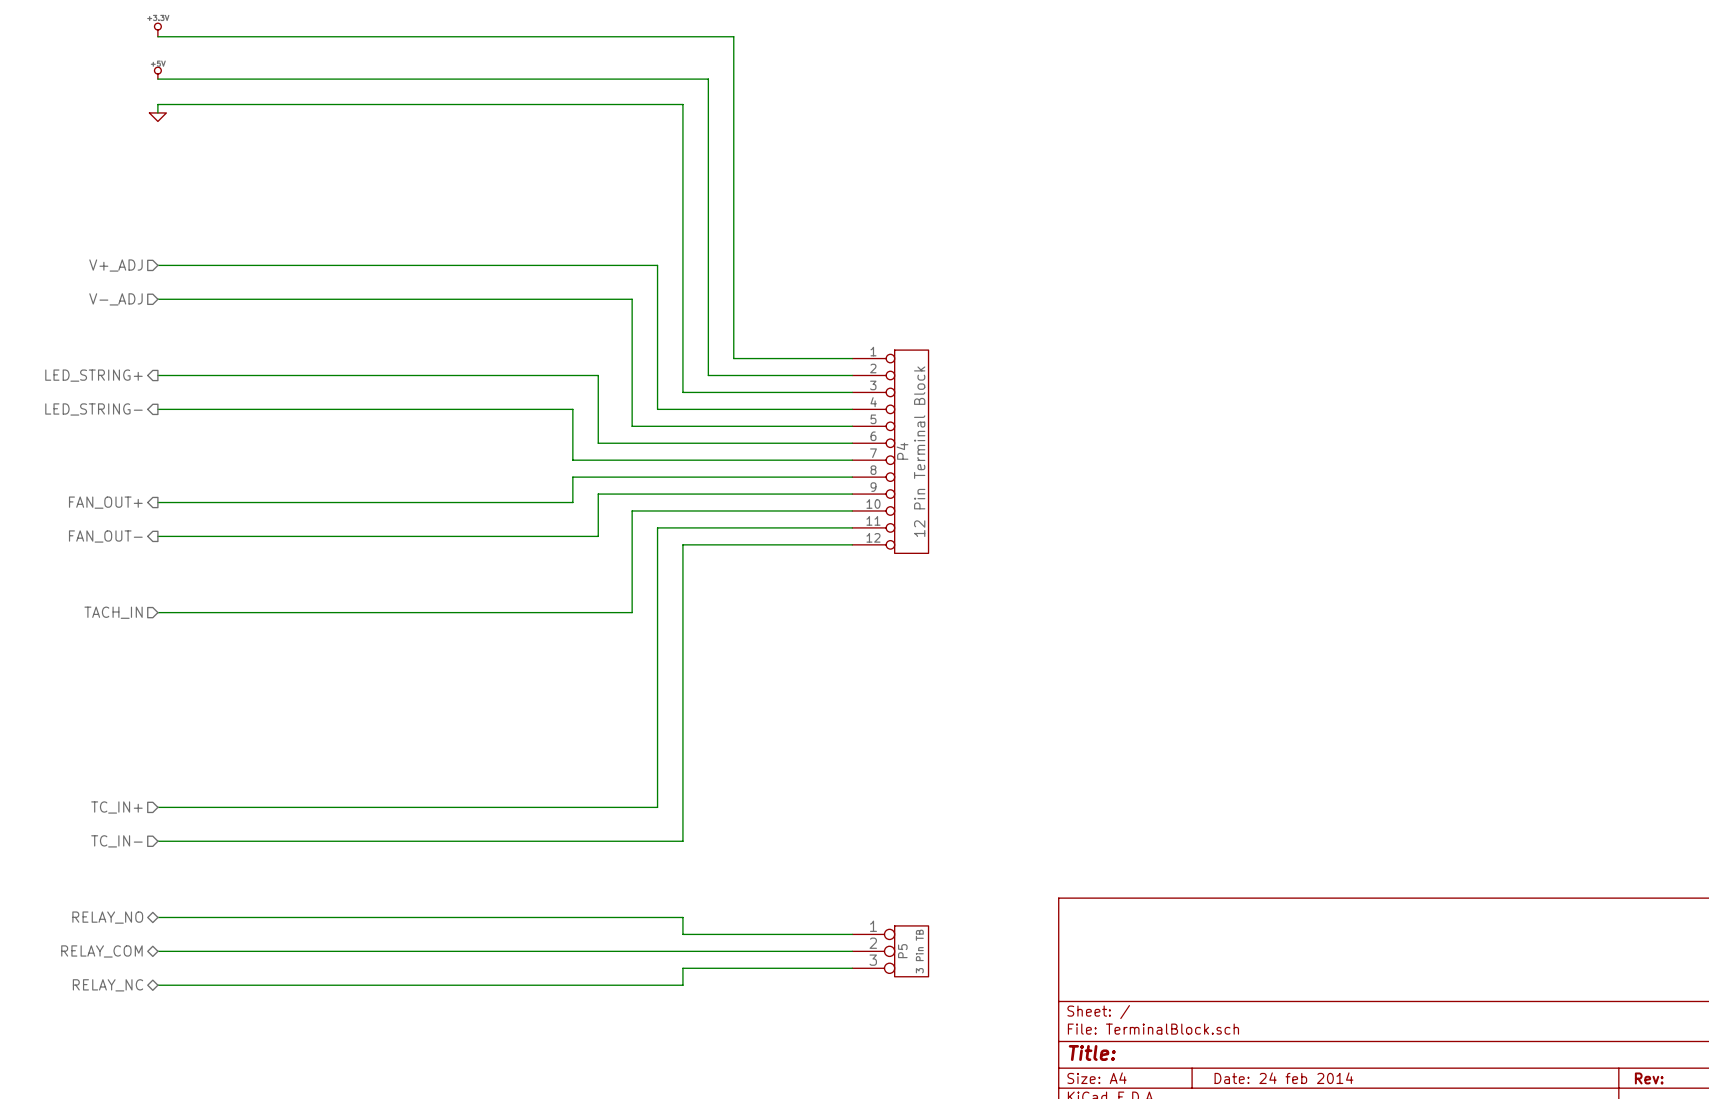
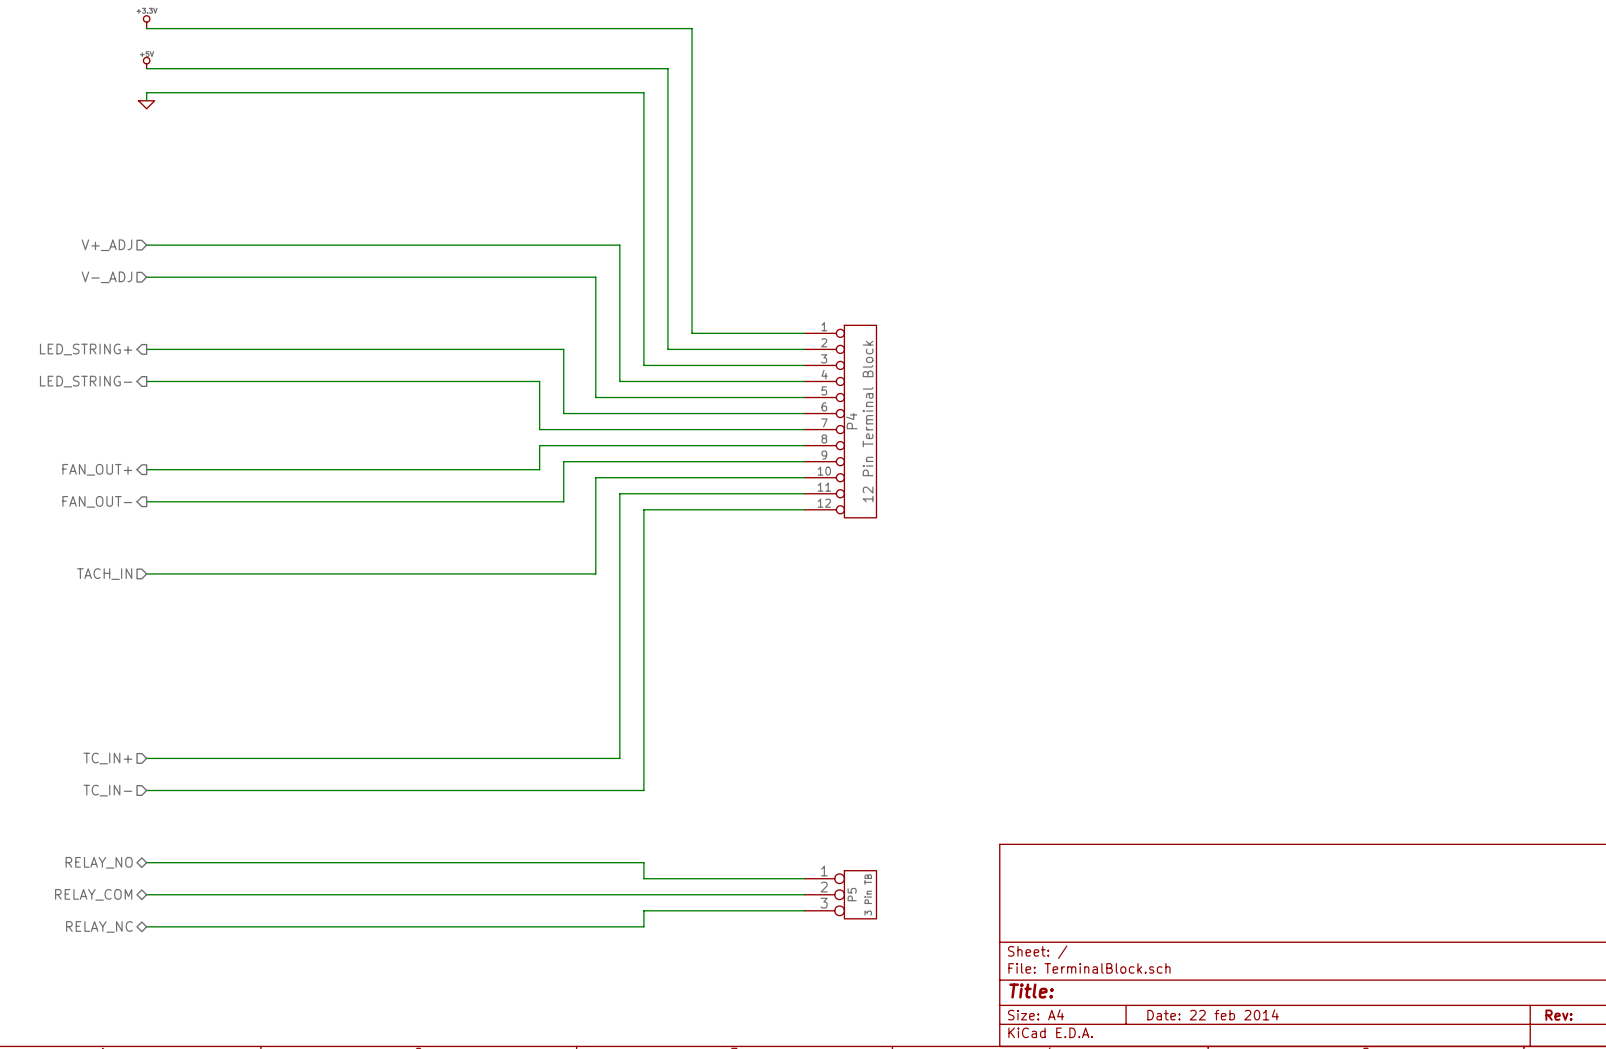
title block: Date: 24 feb 2014 (1283, 1078) -> Date: 22 feb 2014 (1213, 1014)

